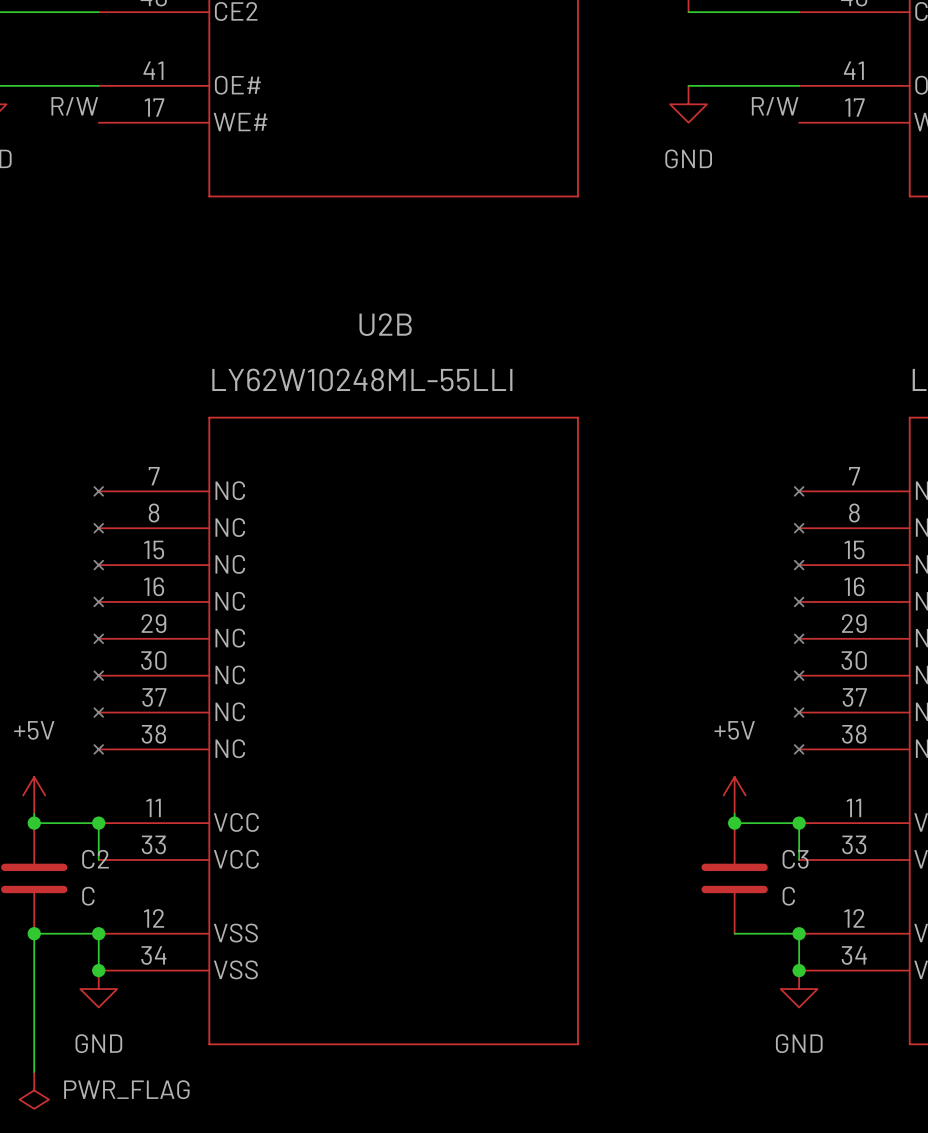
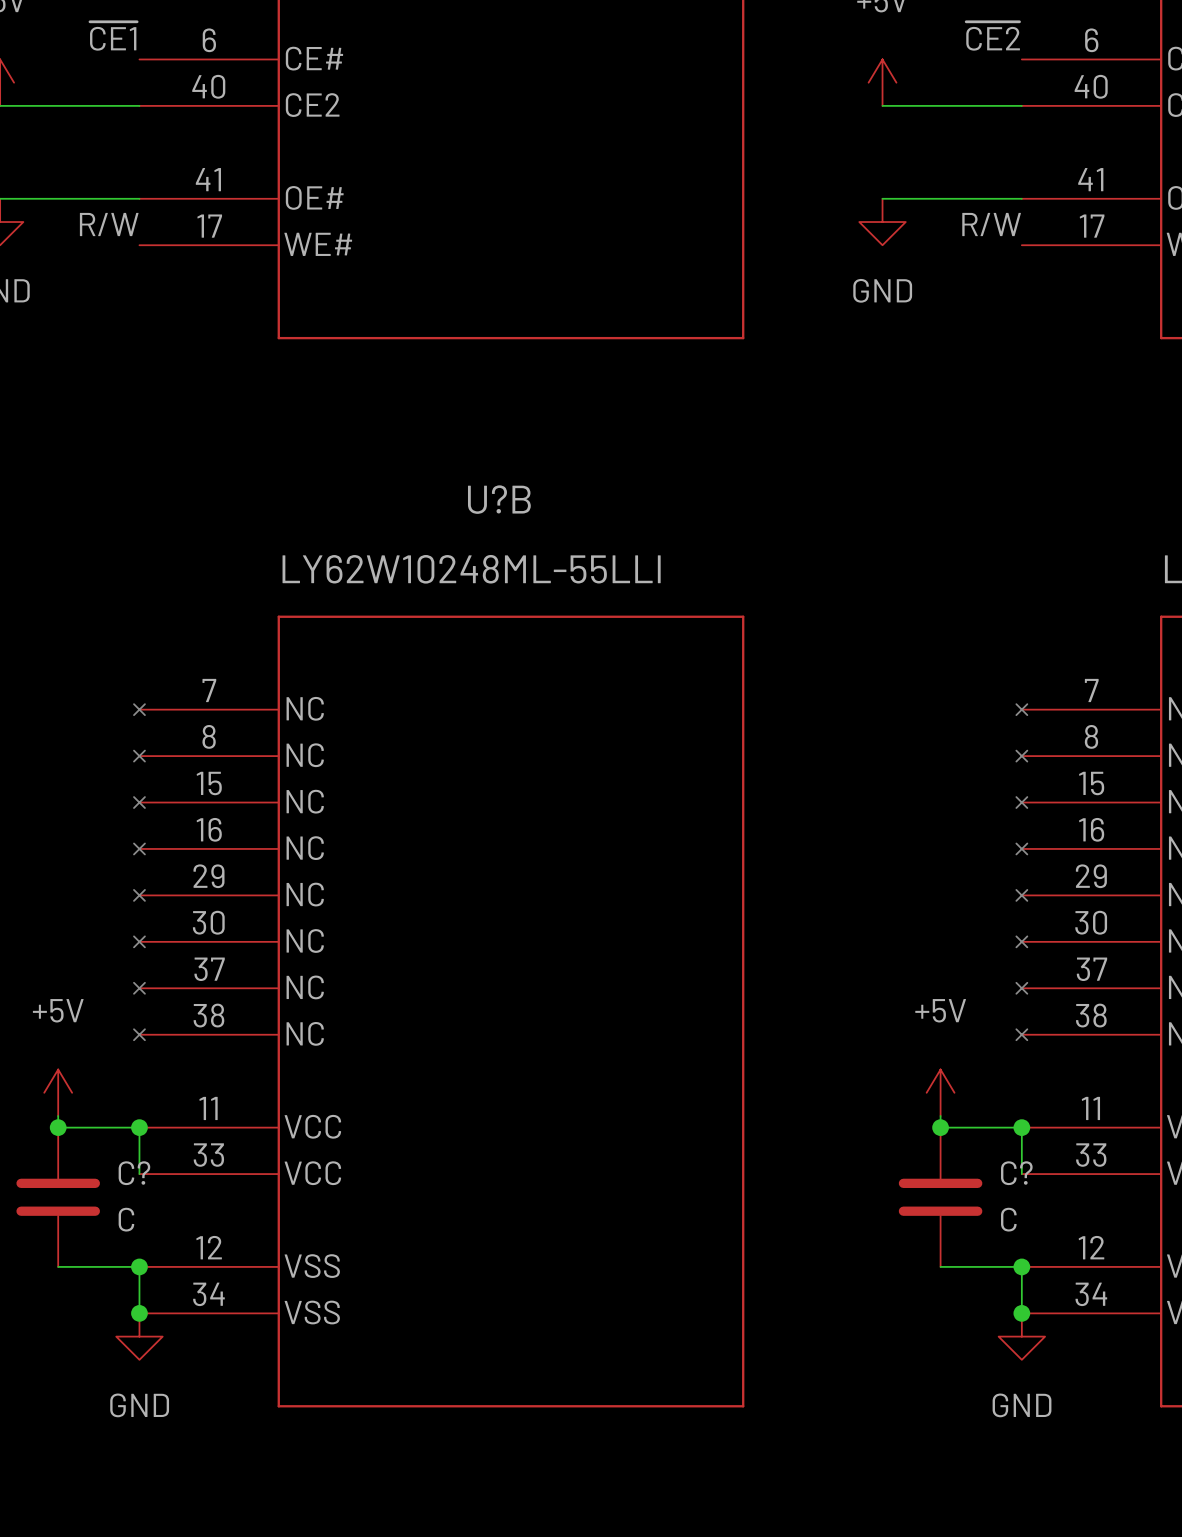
U2B name: U2B (385, 324) -> U?B (499, 499)
C2 name: C2 (95, 859) -> C? (134, 1173)
C3 name: C3 (795, 859) -> C? (1016, 1173)
wire: (34, 933) (34, 1071) -> none
junction: (34, 933) -> none
power symbol: PWR_FLAG (34, 1090) -> none

